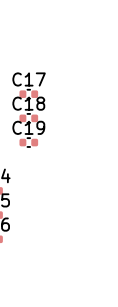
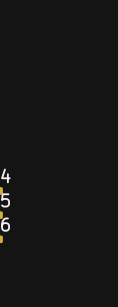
C17: (28, 94) -> none
C18: (28, 118) -> none
C19: (28, 142) -> none

